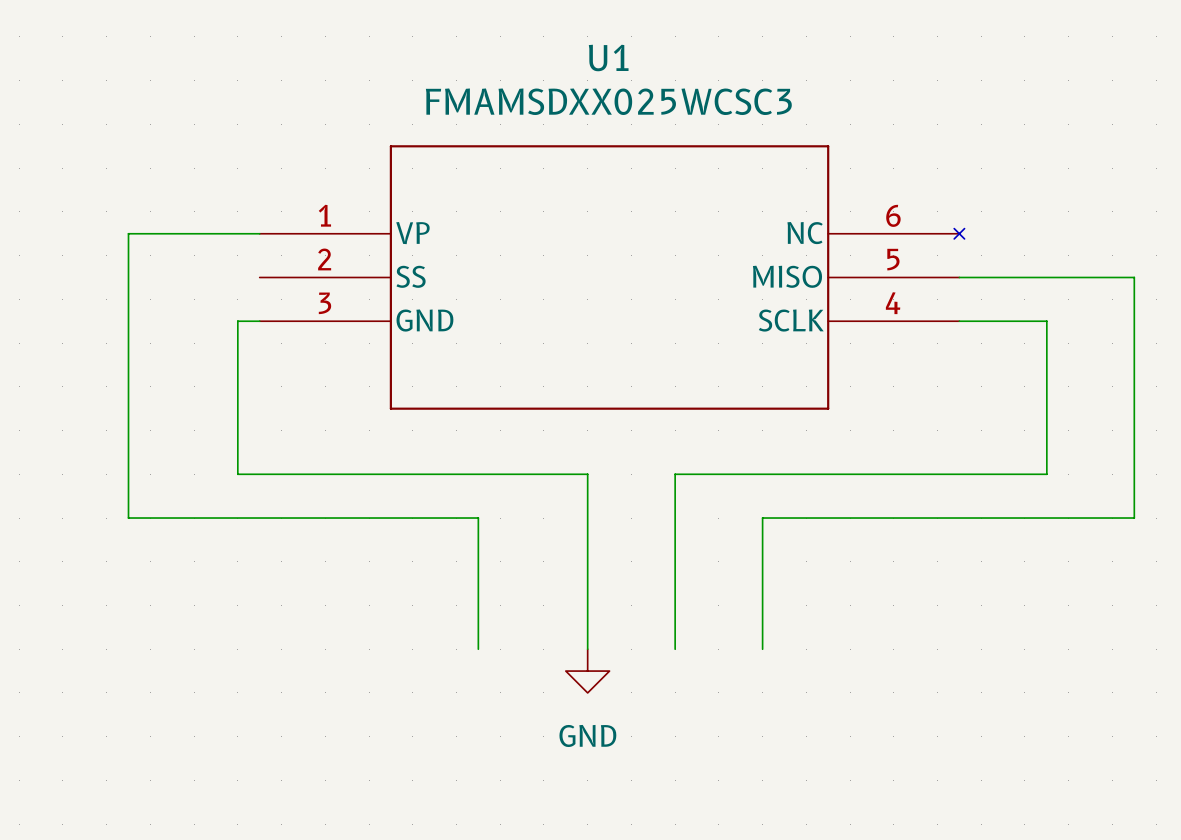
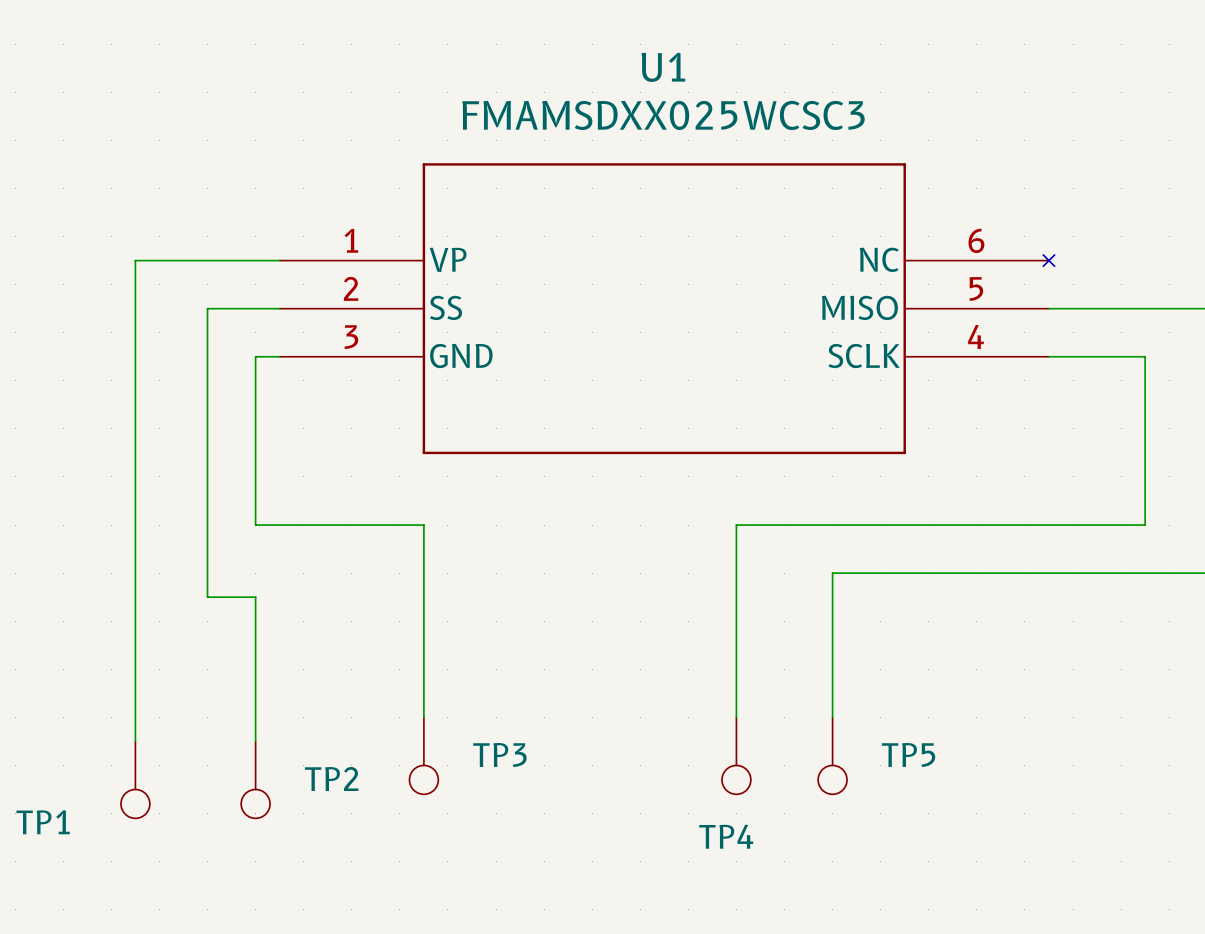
wire: none -> (279, 308) (207, 308) (207, 597) (255, 597) (255, 741)
wire: (390, 474) (587, 474) (587, 649) -> (423, 525) (423, 717)
wire: (128, 518) (478, 518) (478, 649) -> (135, 573) (135, 741)
power symbol: GND (587, 671) -> none
TP3: none -> (423, 755)
TP4: none -> (736, 755)
TP5: none -> (832, 755)
TP1: none -> (135, 779)
TP2: none -> (255, 779)

